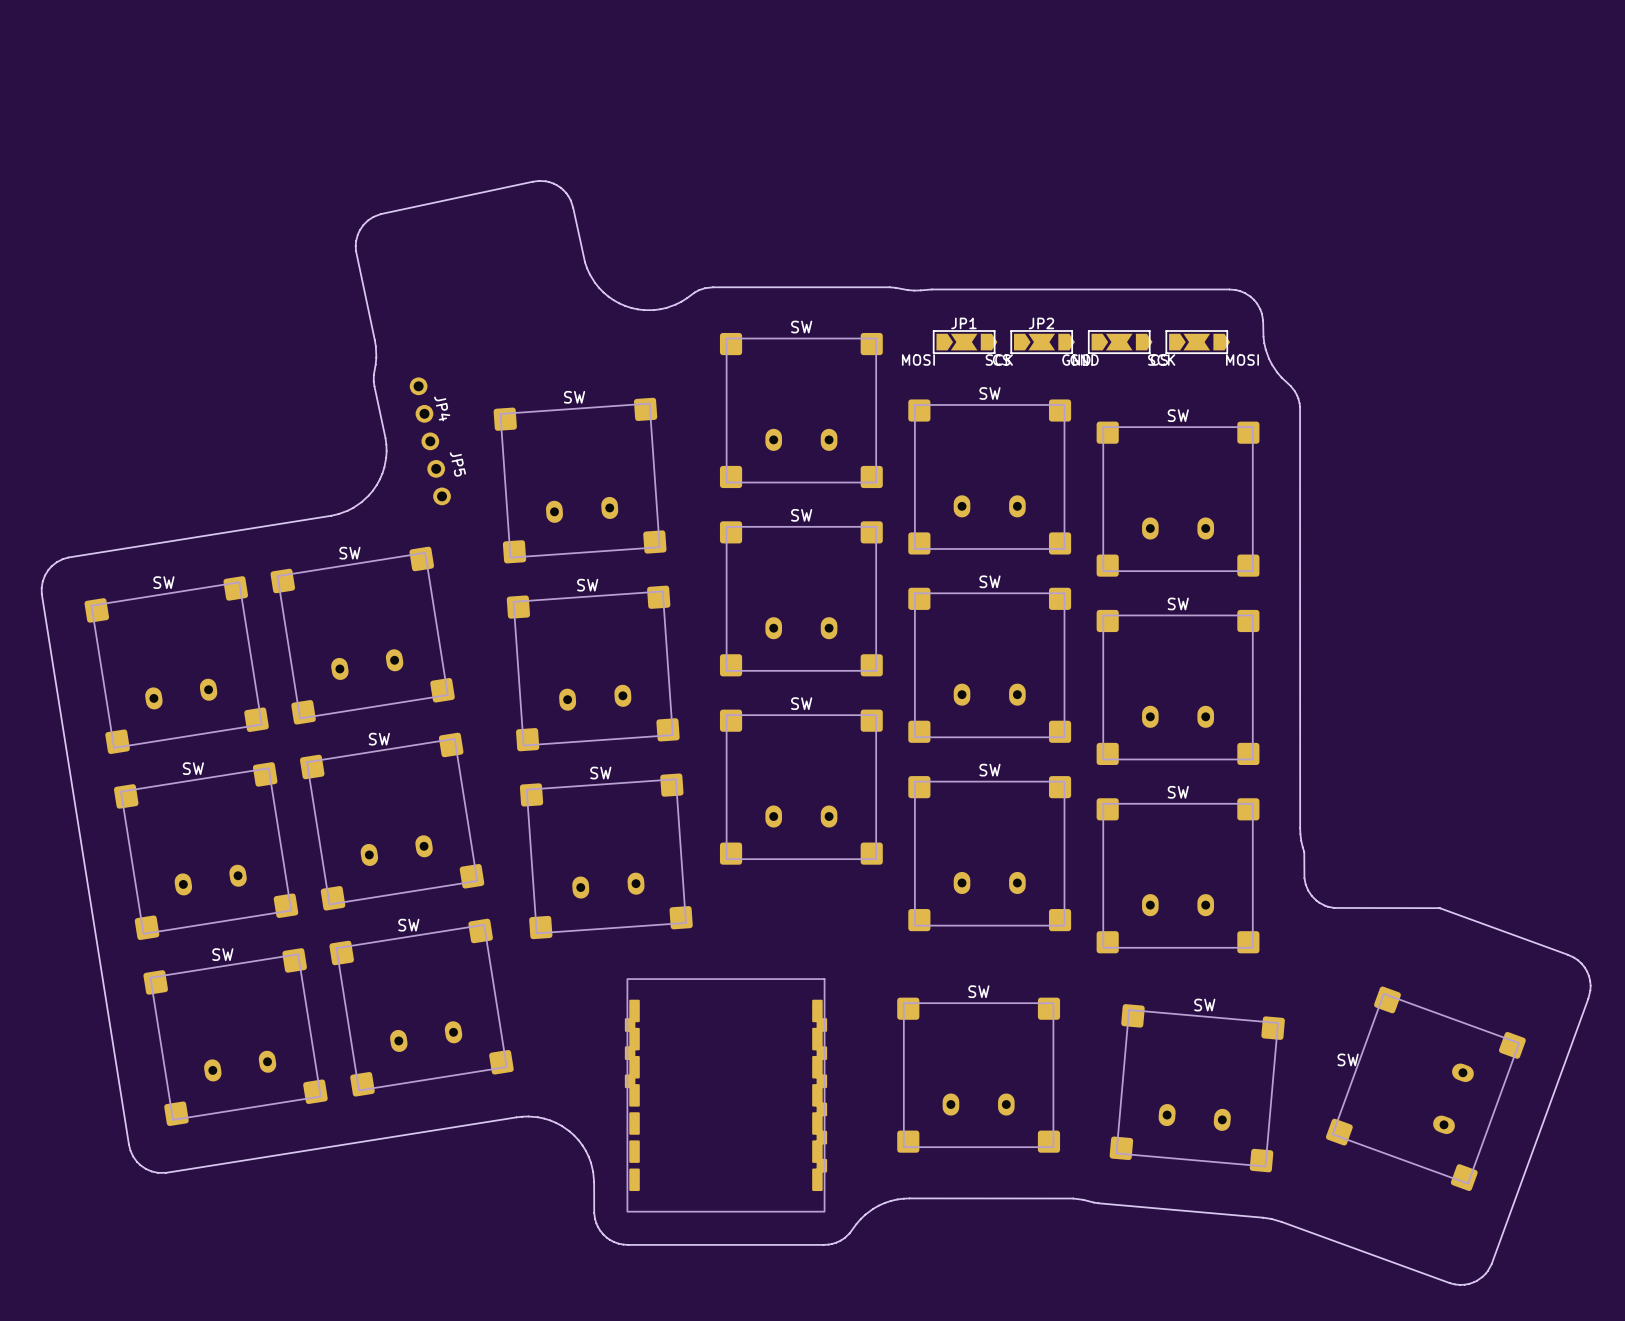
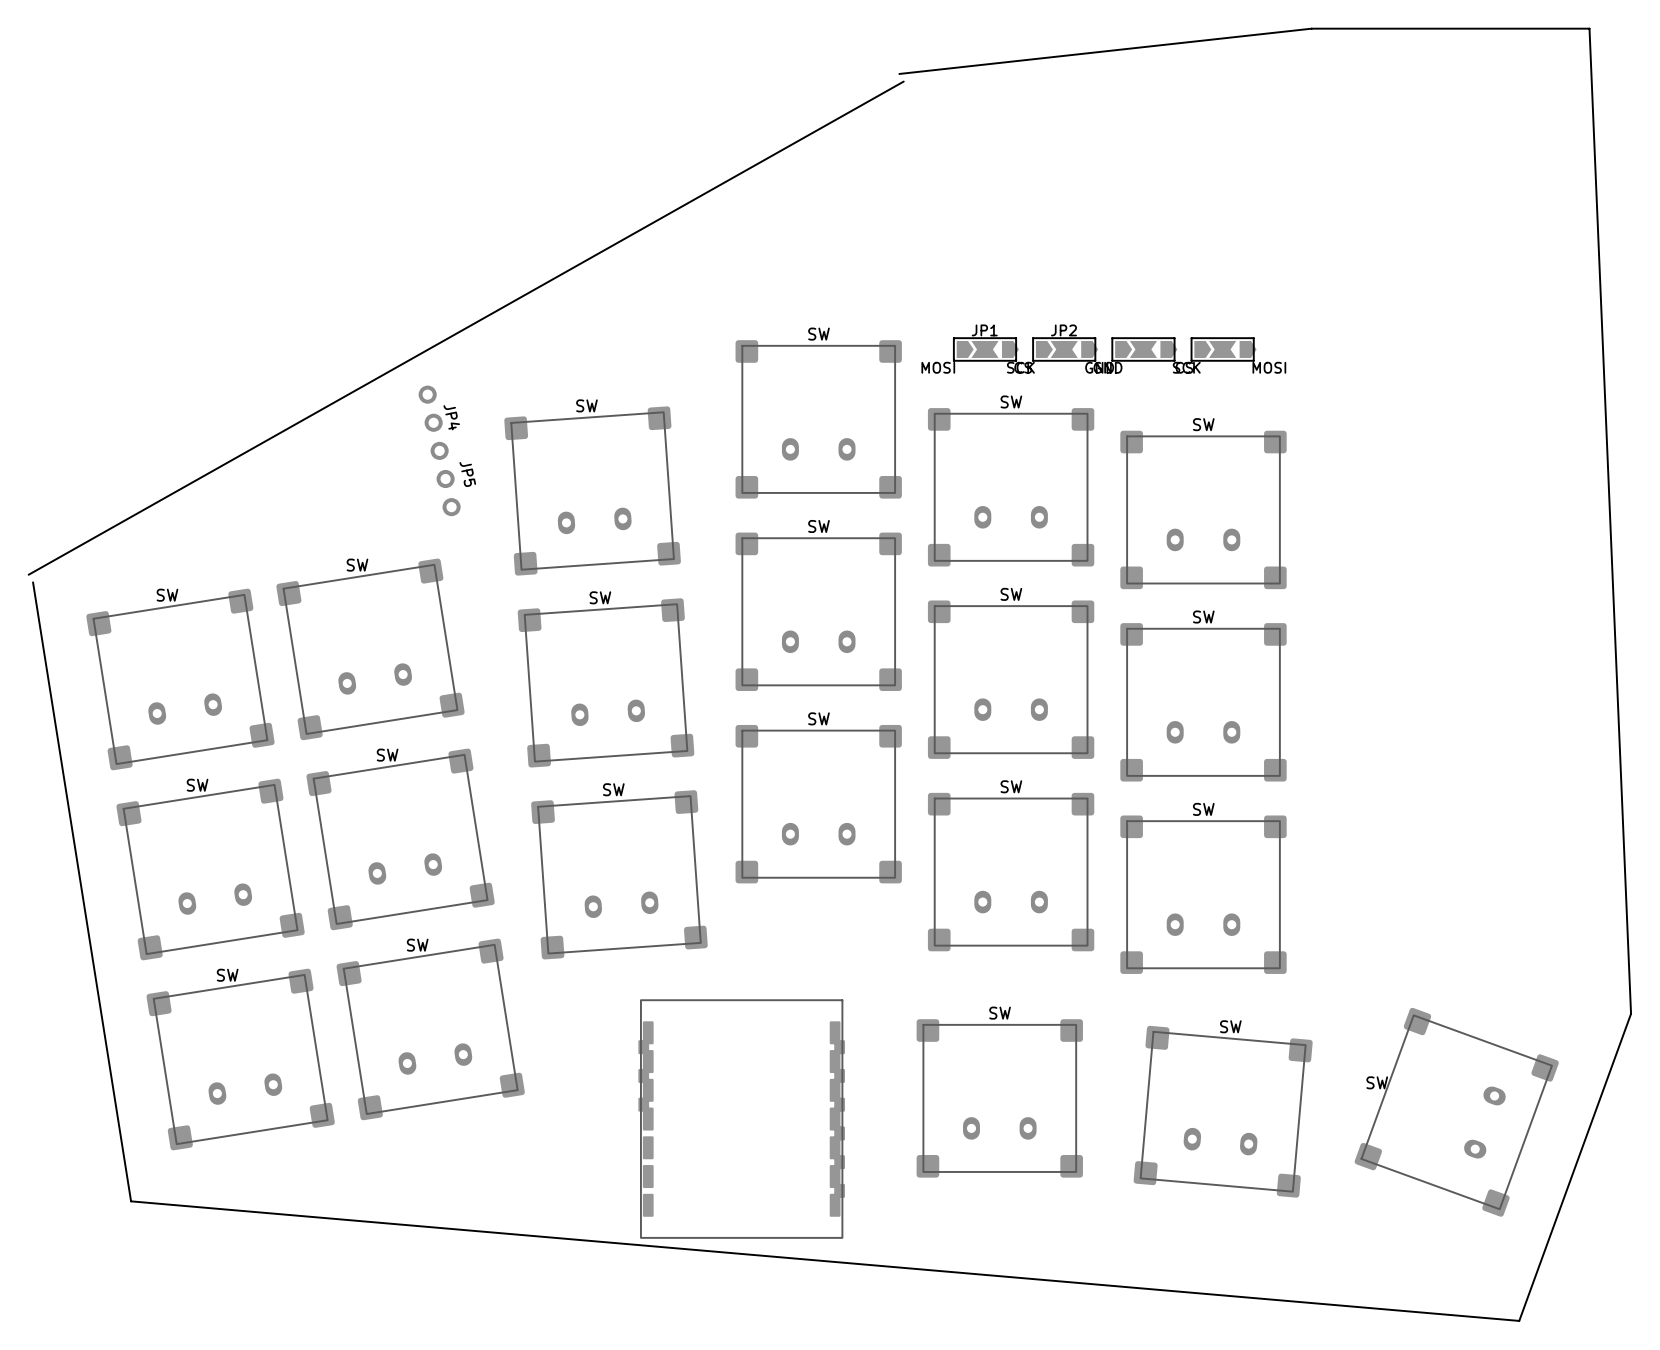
board edge: none -> (899, 73) (1311, 28) (1589, 28) (1631, 1013) (1519, 1320) (131, 1201) (33, 582)
board edge: none -> (903, 81) (28, 574)
board edge: (539, 180) (556, 184) (563, 189) (570, 200) (585, 262) (594, 282) (613, 300) (637, 309) (653, 310) (666, 307) (681, 301) (699, 290) (713, 287) (889, 287) (914, 290) (1229, 289) (1244, 293) (1254, 299) (1261, 313) (1264, 343) (1269, 358) (1277, 372) (1294, 391) (1300, 407) (1300, 828) (1304, 851) (1304, 878) (1308, 890) (1319, 902) (1334, 907) (1440, 908) (1573, 957) (1584, 967) (1590, 980) (1588, 998) (1491, 1264) (1482, 1277) (1464, 1284) (1450, 1283) (1271, 1218) (1098, 1203) (1073, 1198) (897, 1199) (873, 1208) (860, 1219) (844, 1237) (828, 1244) (623, 1244) (606, 1237) (596, 1223) (594, 1212) (593, 1171) (588, 1156) (582, 1145) (574, 1135) (561, 1125) (537, 1117) (516, 1117) (166, 1172) (151, 1171) (136, 1161) (128, 1144) (41, 594) (45, 575) (56, 562) (68, 557) (331, 515) (347, 510) (361, 502) (373, 490) (379, 479) (384, 467) (386, 451) (373, 381) (375, 346) (356, 251) (356, 241) (359, 230) (368, 220) (380, 214) (539, 180) -> none

